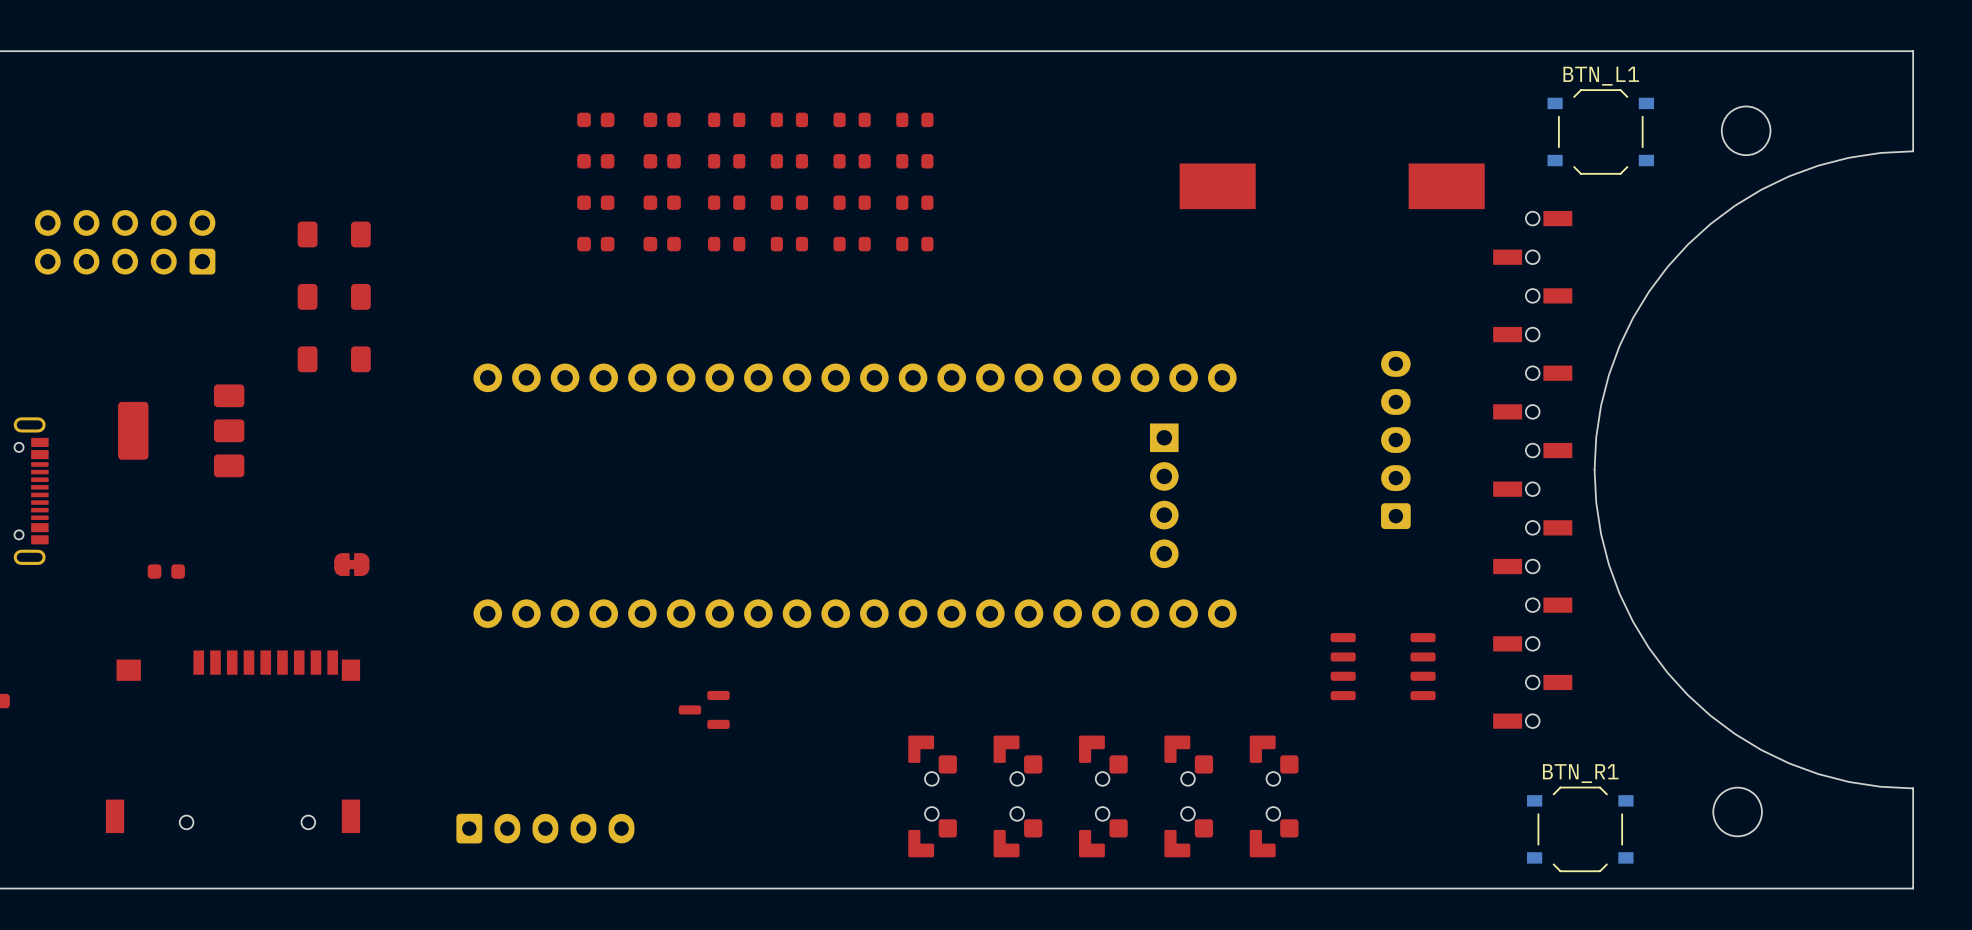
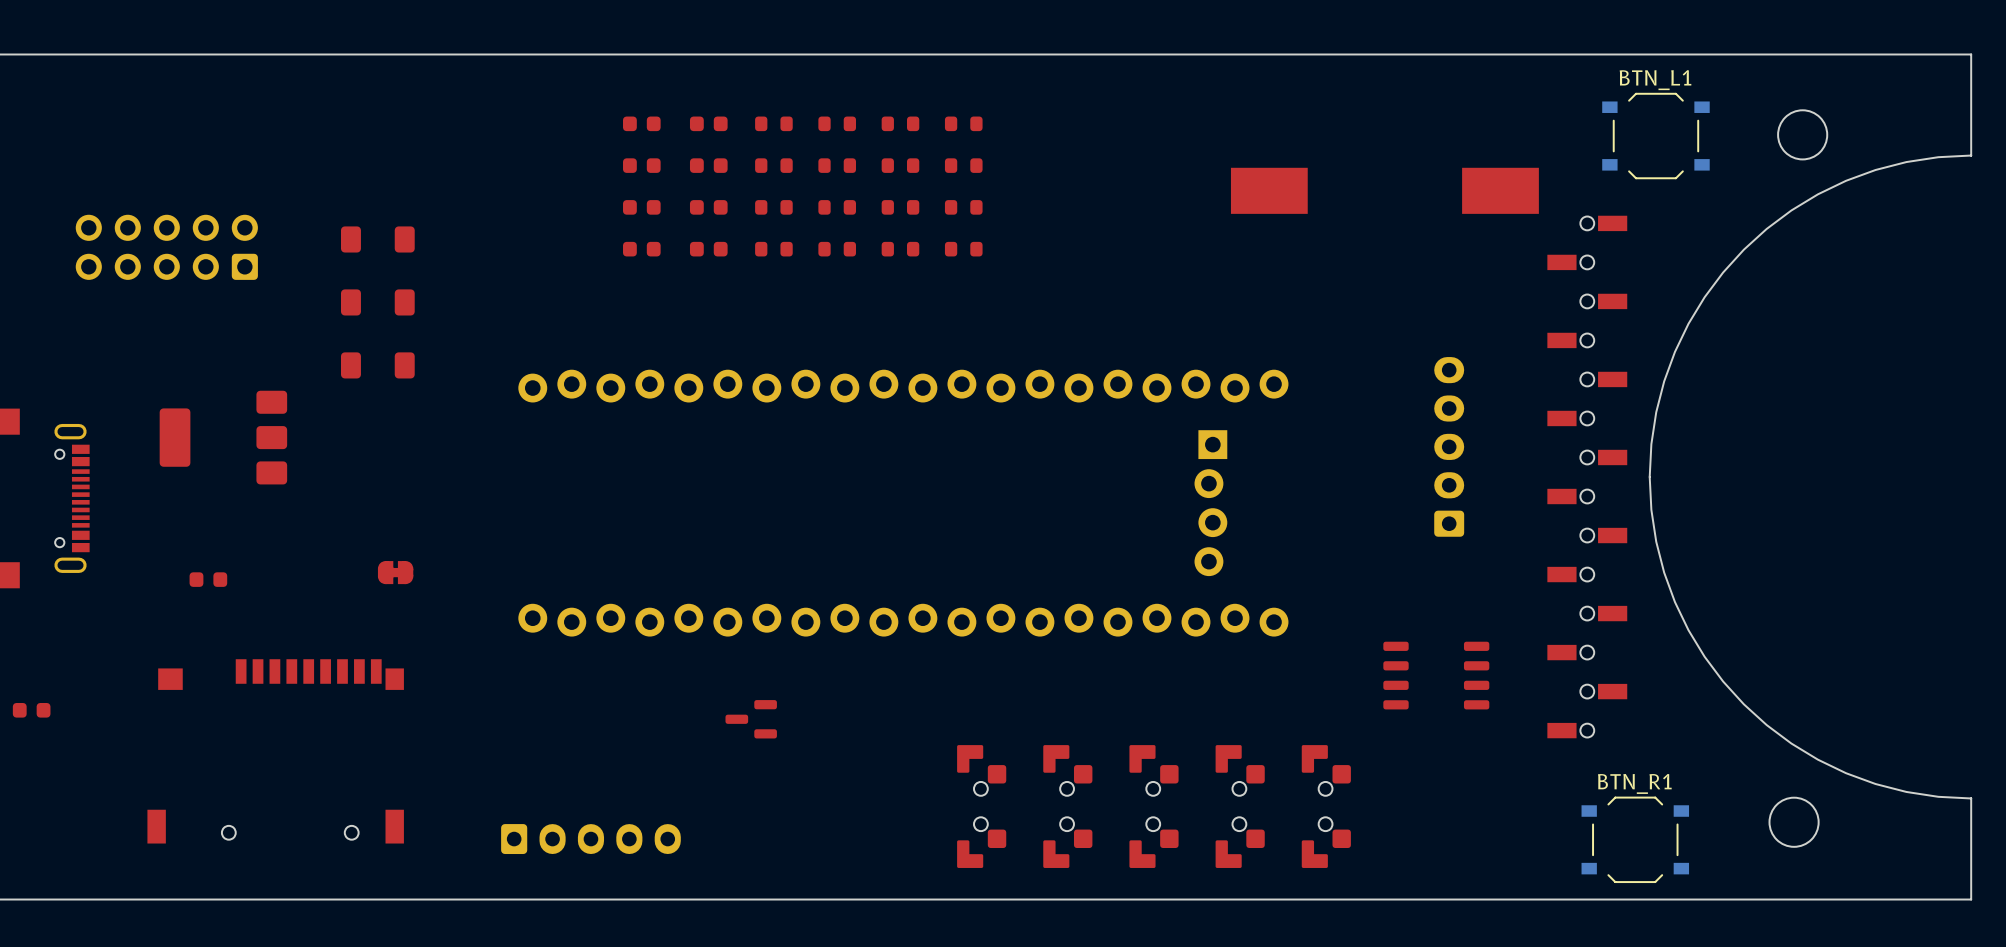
part footprint: [473, 363, 1237, 628] -> [518, 369, 1289, 637]

